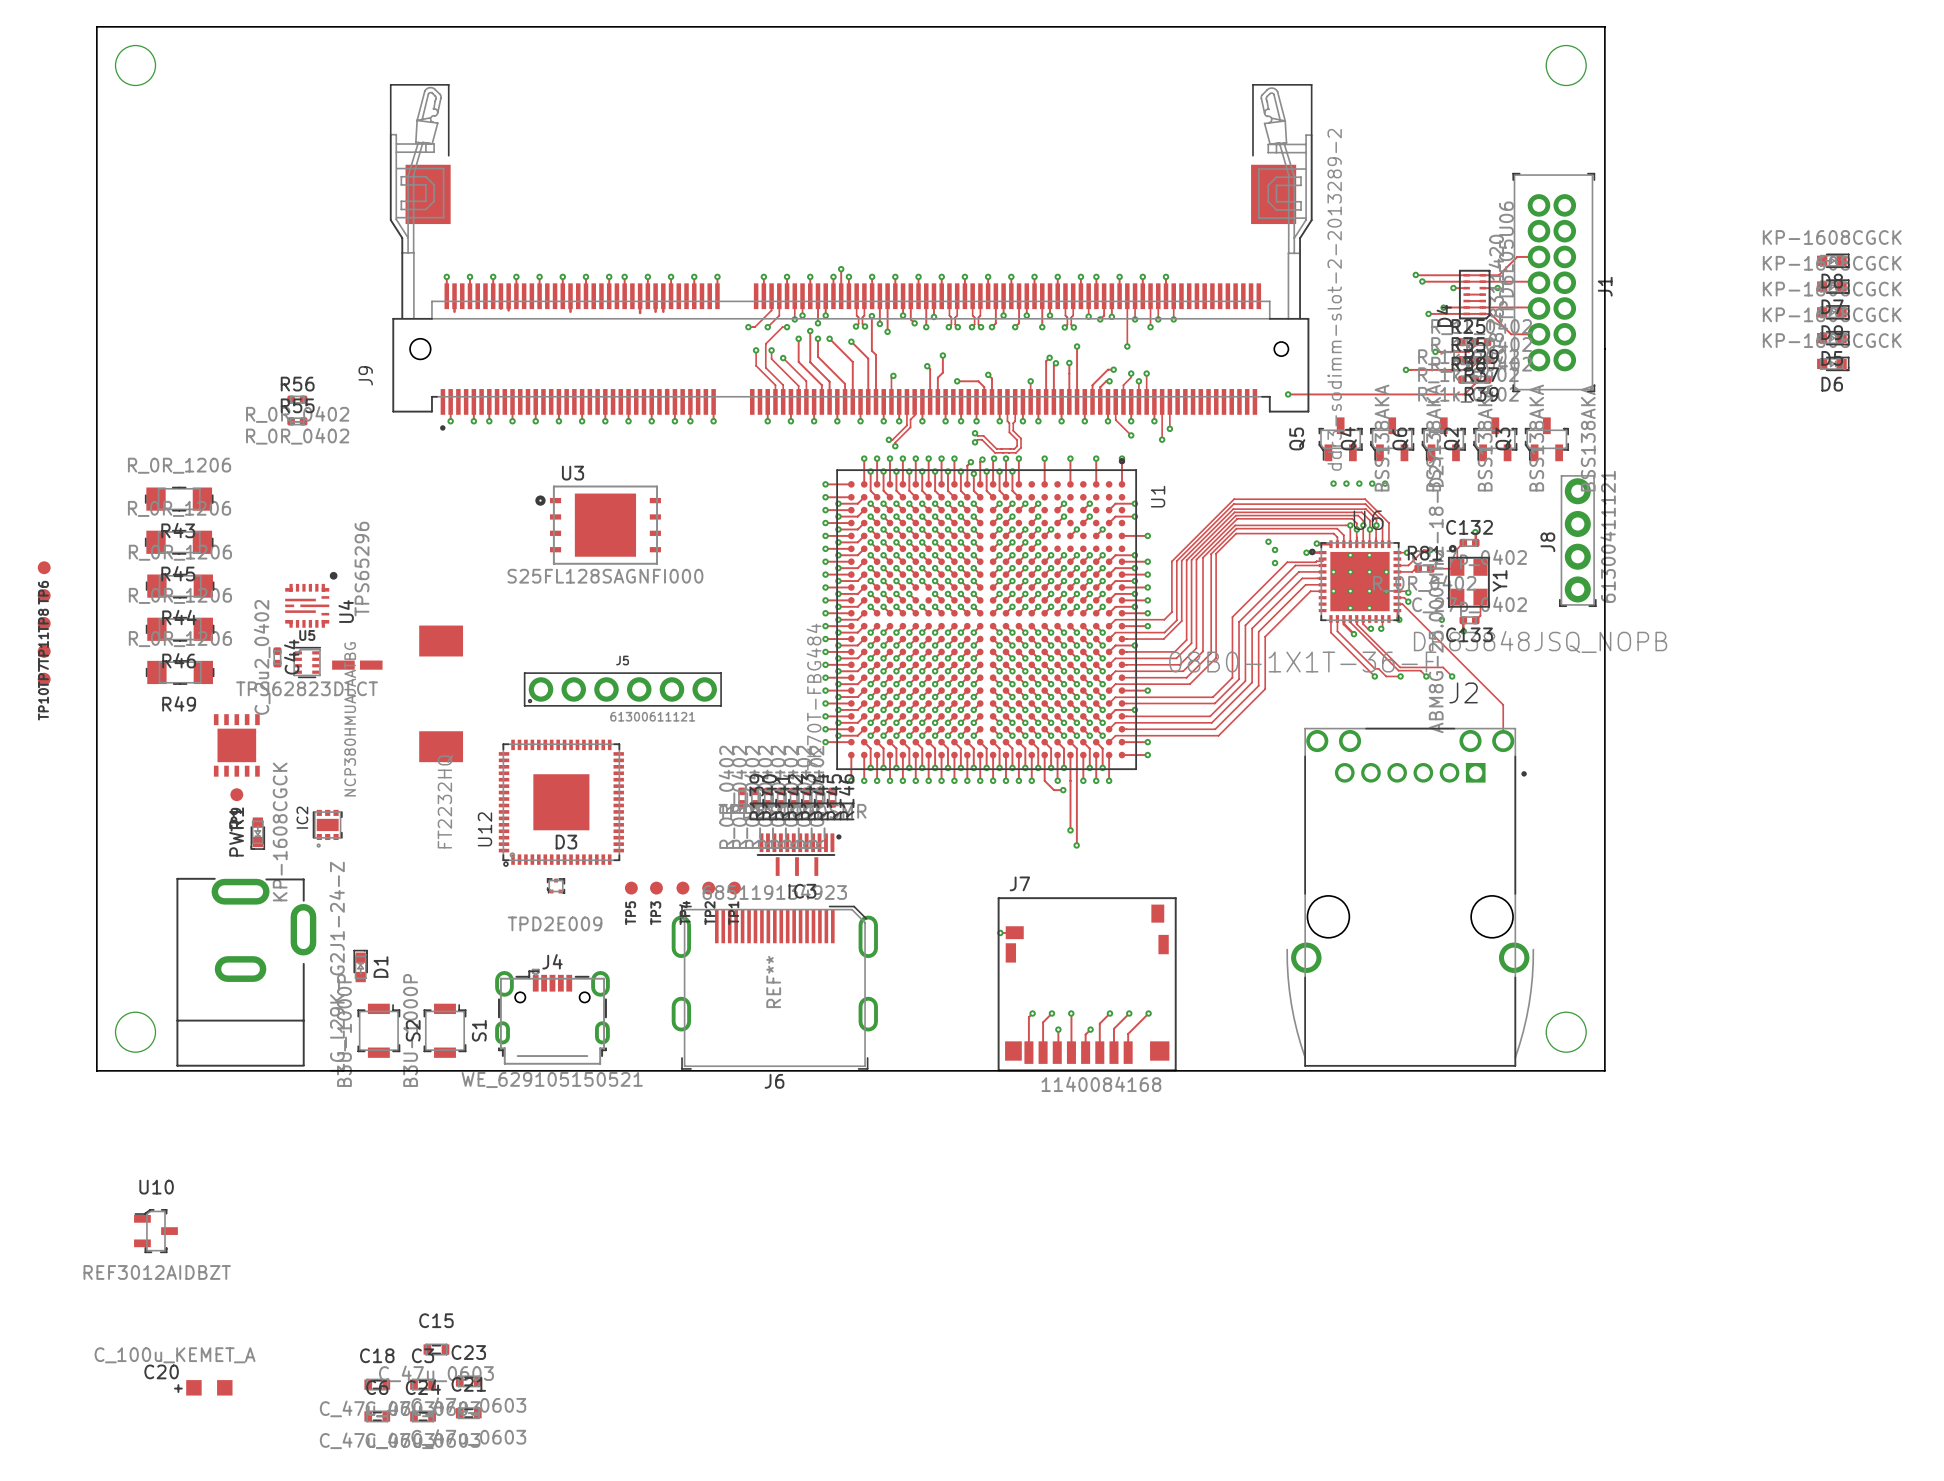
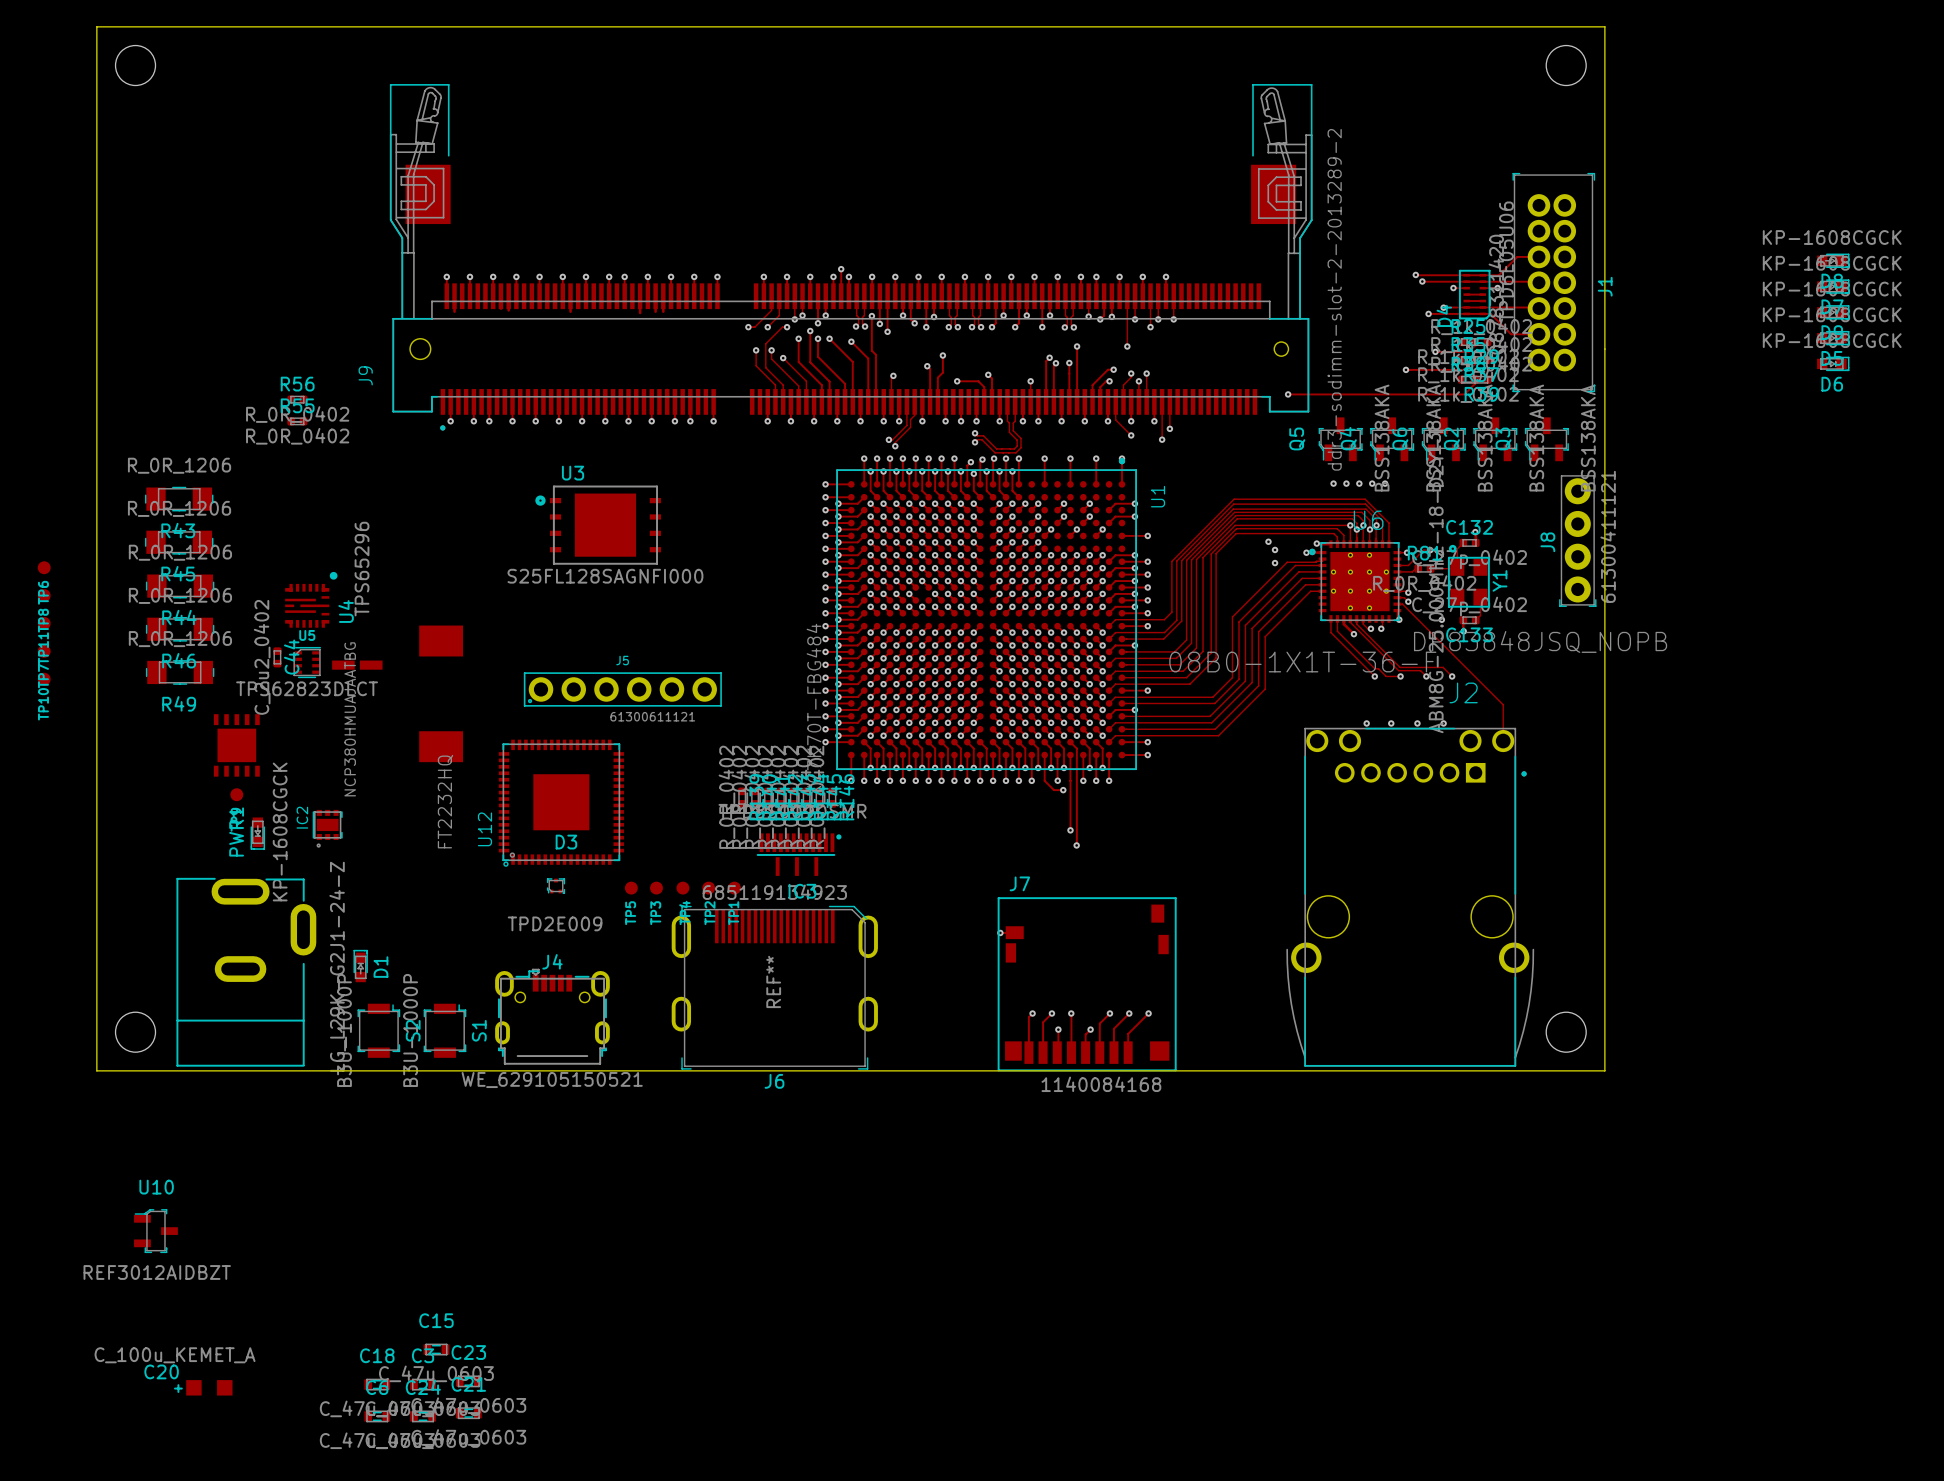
via: none -> (1366, 723)
via: none -> (1391, 723)
via: none -> (1417, 723)
via: none -> (1443, 723)

